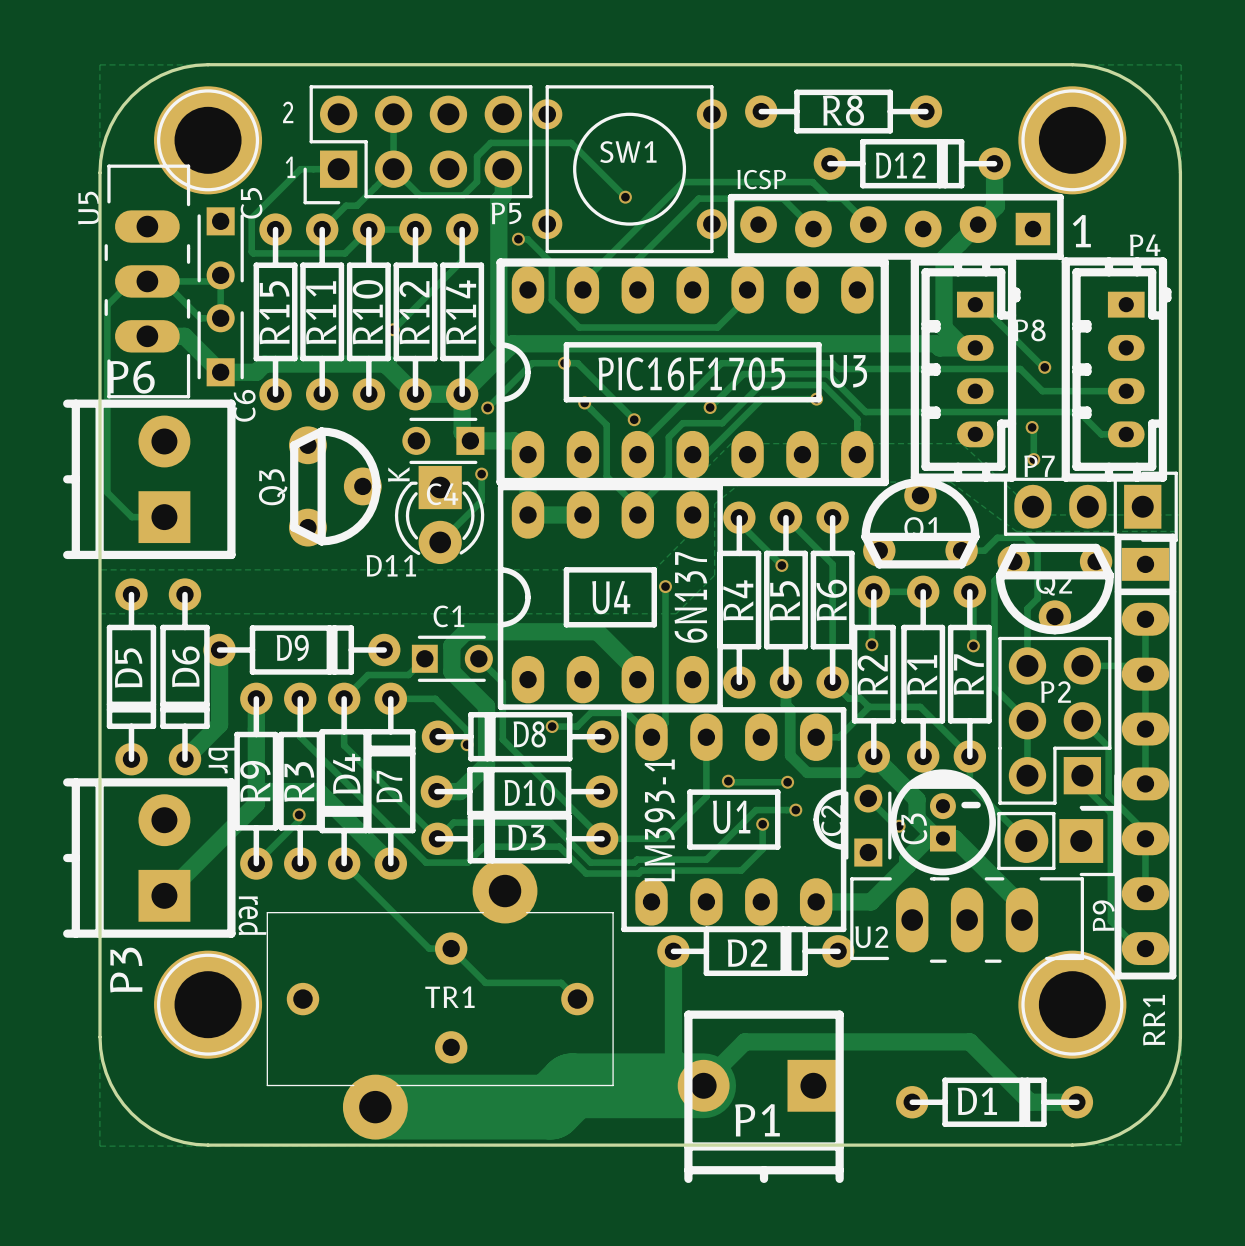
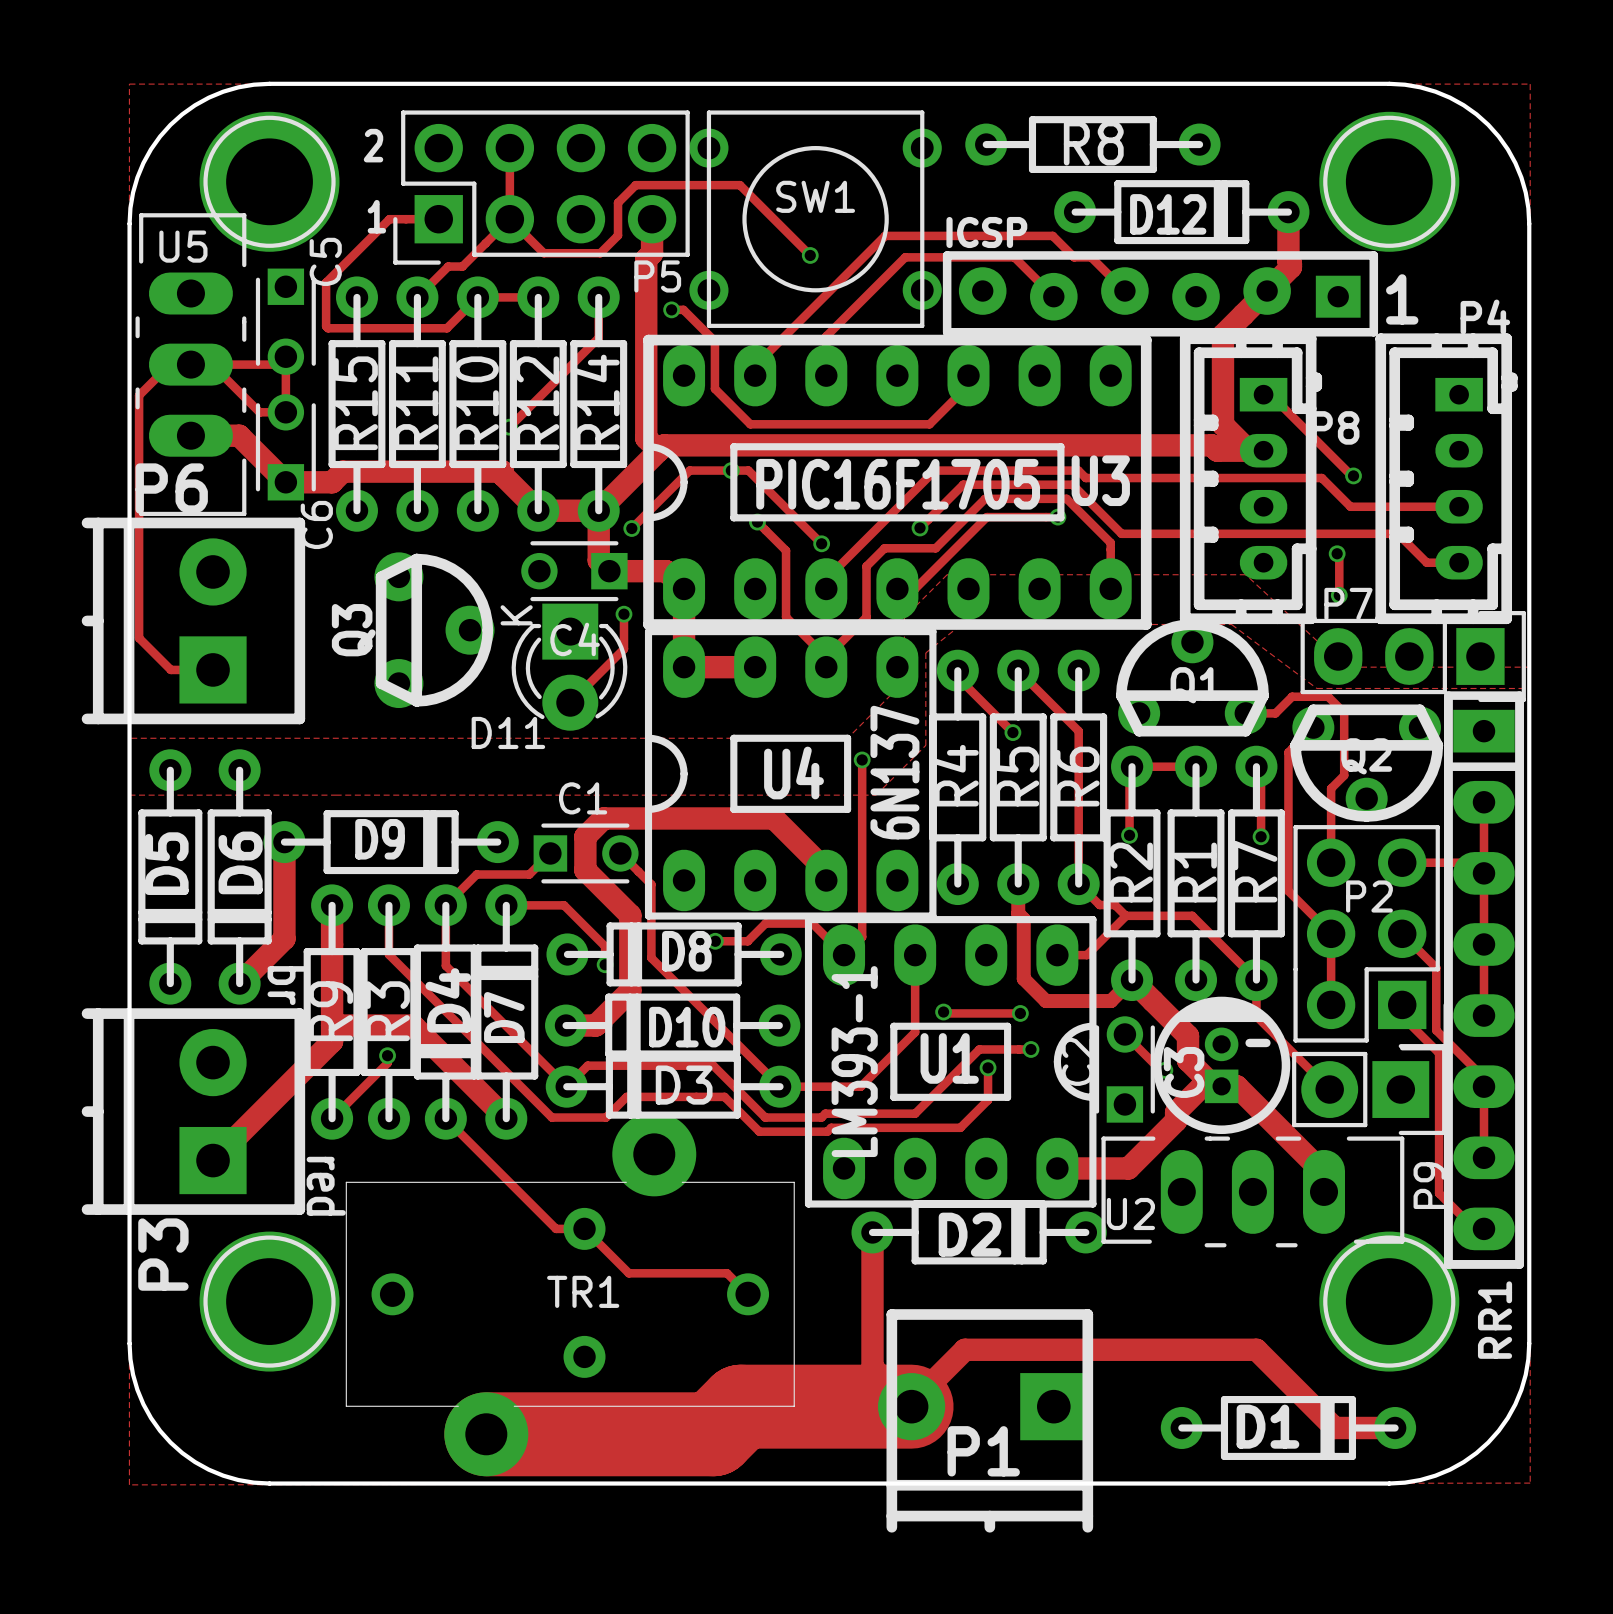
U5 name rotation: 0° (89, 208) -> 90° clockwise (183, 246)

